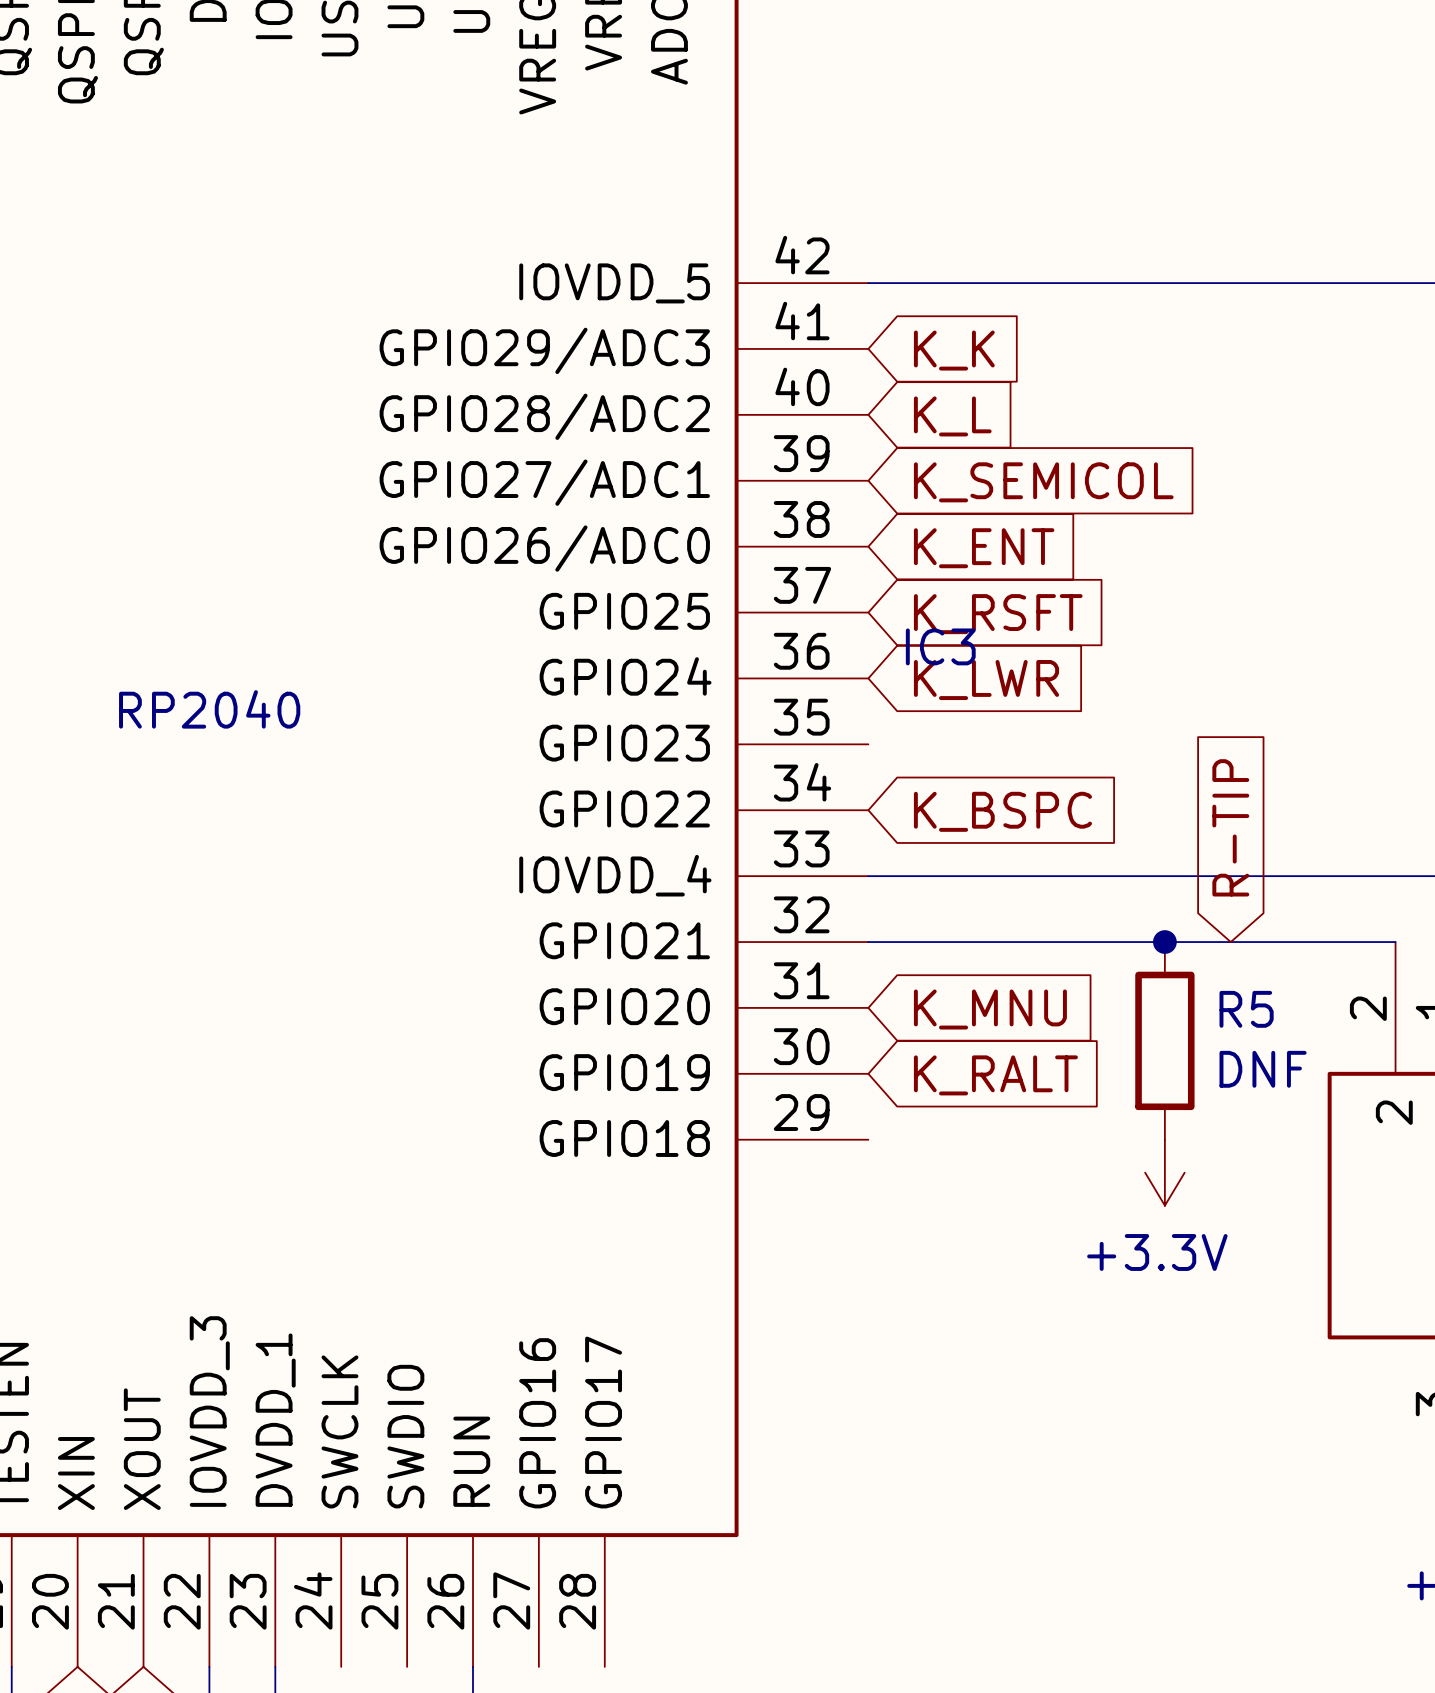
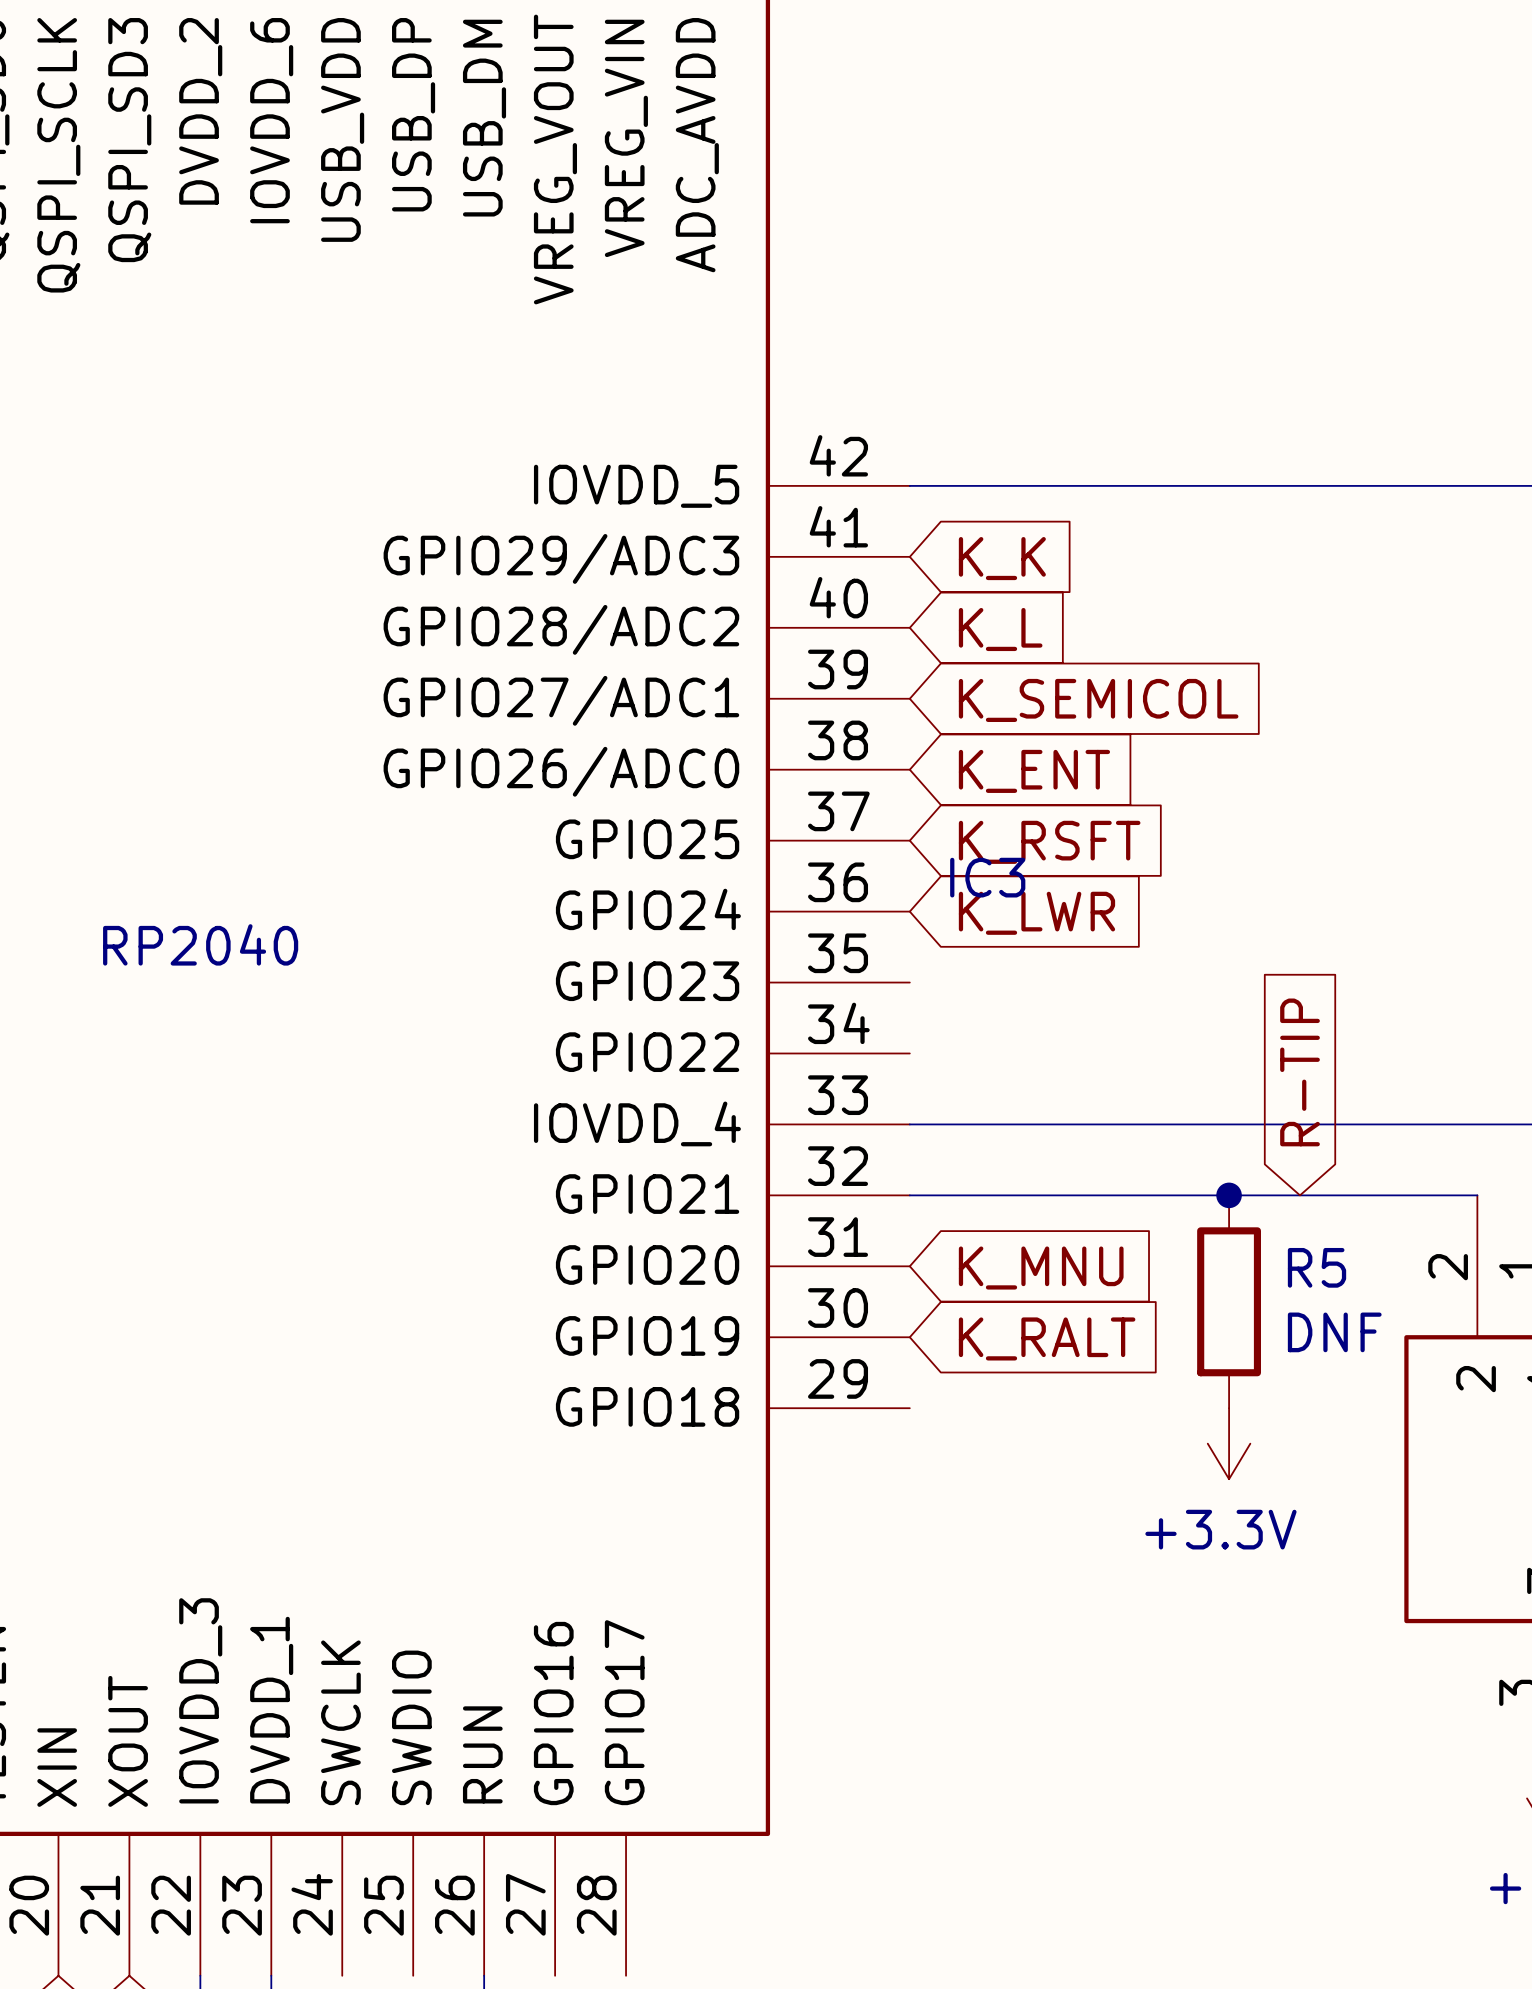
global label: K_BSPC (1002, 811) -> none

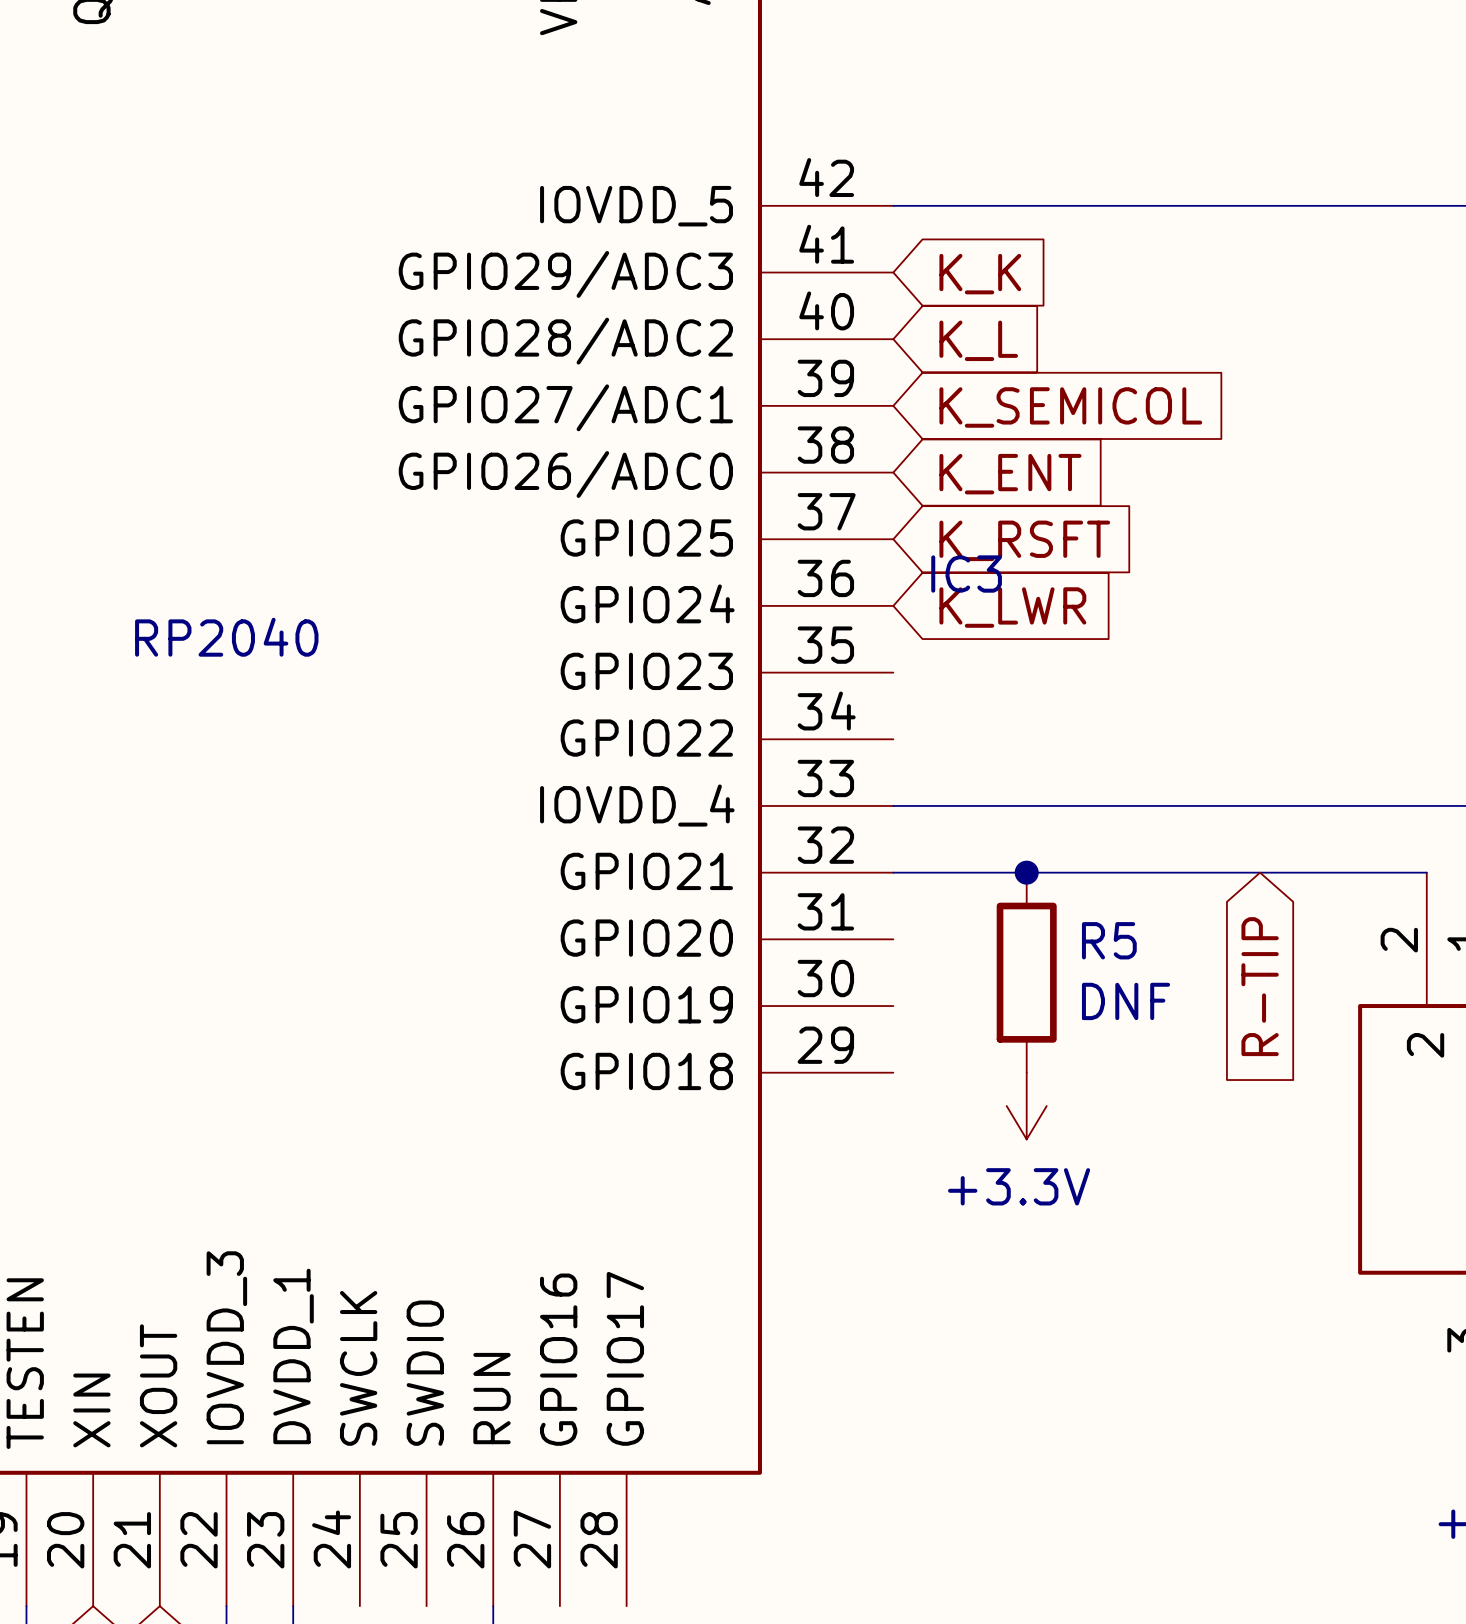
global label rotation: 0° (1300, 1072) -> 180° (1260, 986)
junction: none -> (1026, 872)
junction: (1229, 1195) -> none
global label: K_MNU (1041, 1268) -> none
R5 position: (1229, 1301) -> (1026, 972)
global label: K_RALT (1047, 1338) -> none
power symbol position: +3.3V (1229, 1443) -> +3.3V (1026, 1106)

